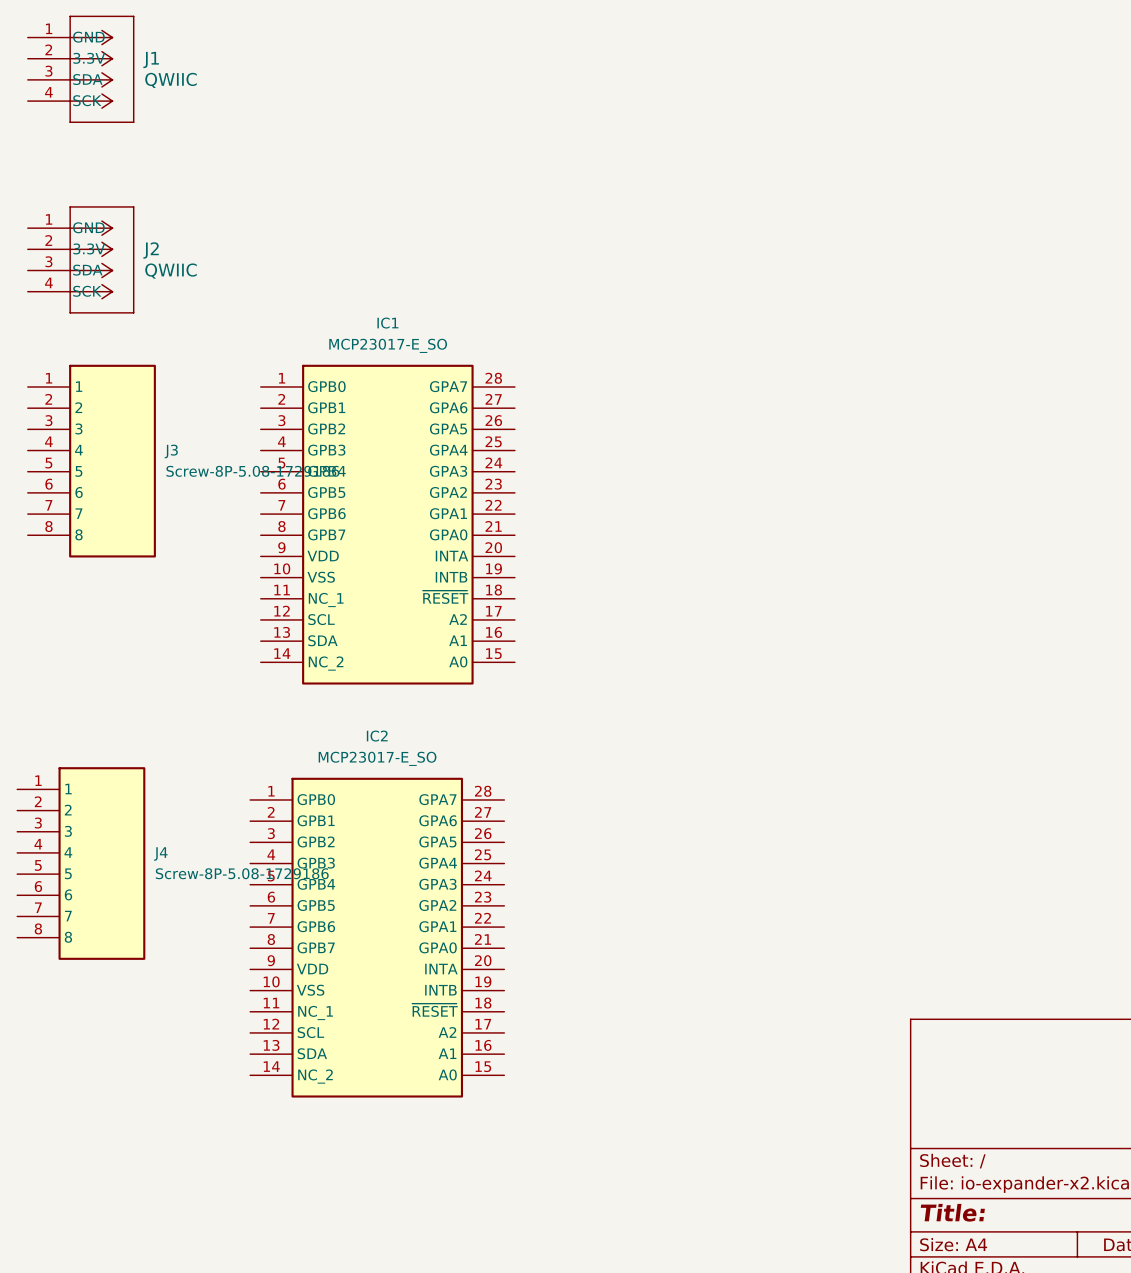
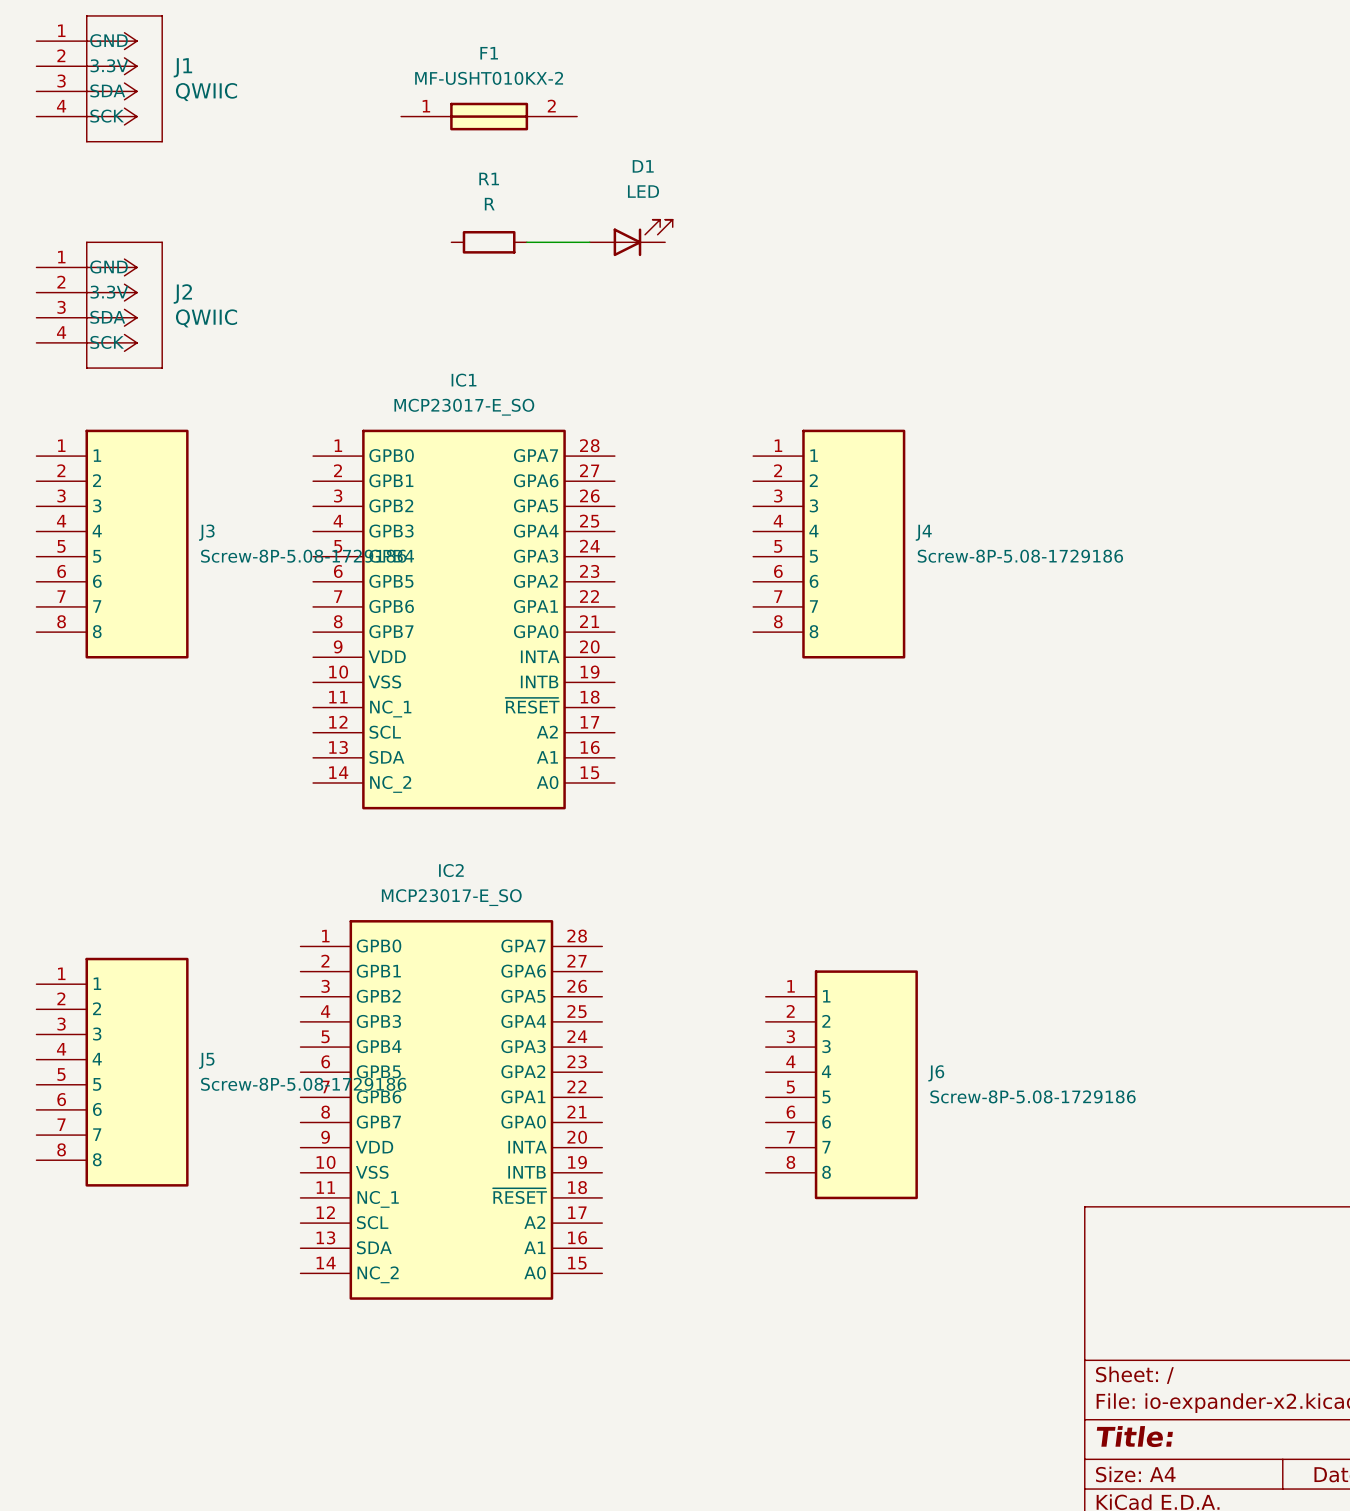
F1: none -> MF-USHT010KX-2 (489, 116)
D1: none -> LED (631, 237)
R1: none -> R (489, 242)
wire: none -> (526, 242) (589, 242)
J4 position: (81, 863) -> (829, 544)
J5: none -> Screw-8P-5.08-1729186 (112, 1072)
J6: none -> Screw-8P-5.08-1729186 (841, 1084)

